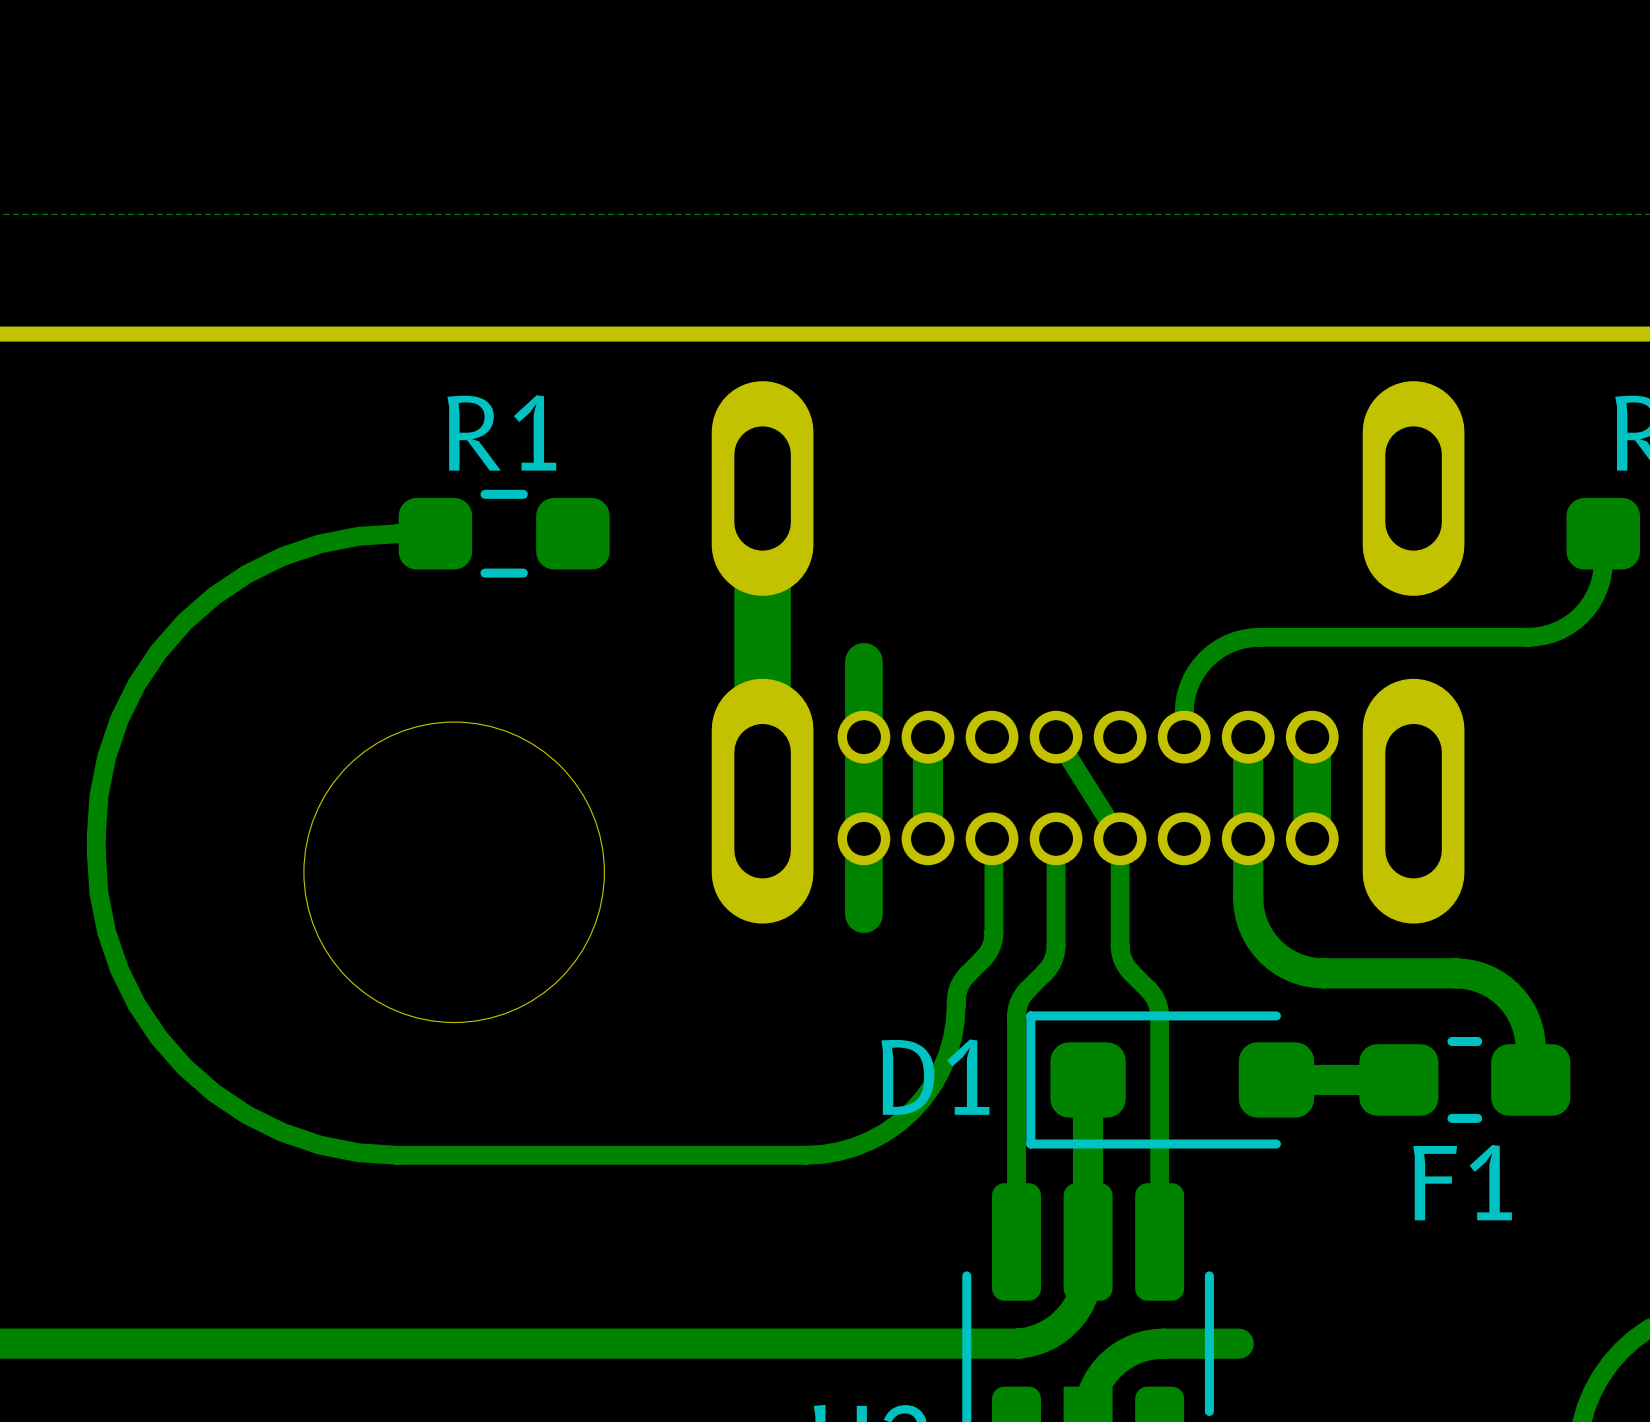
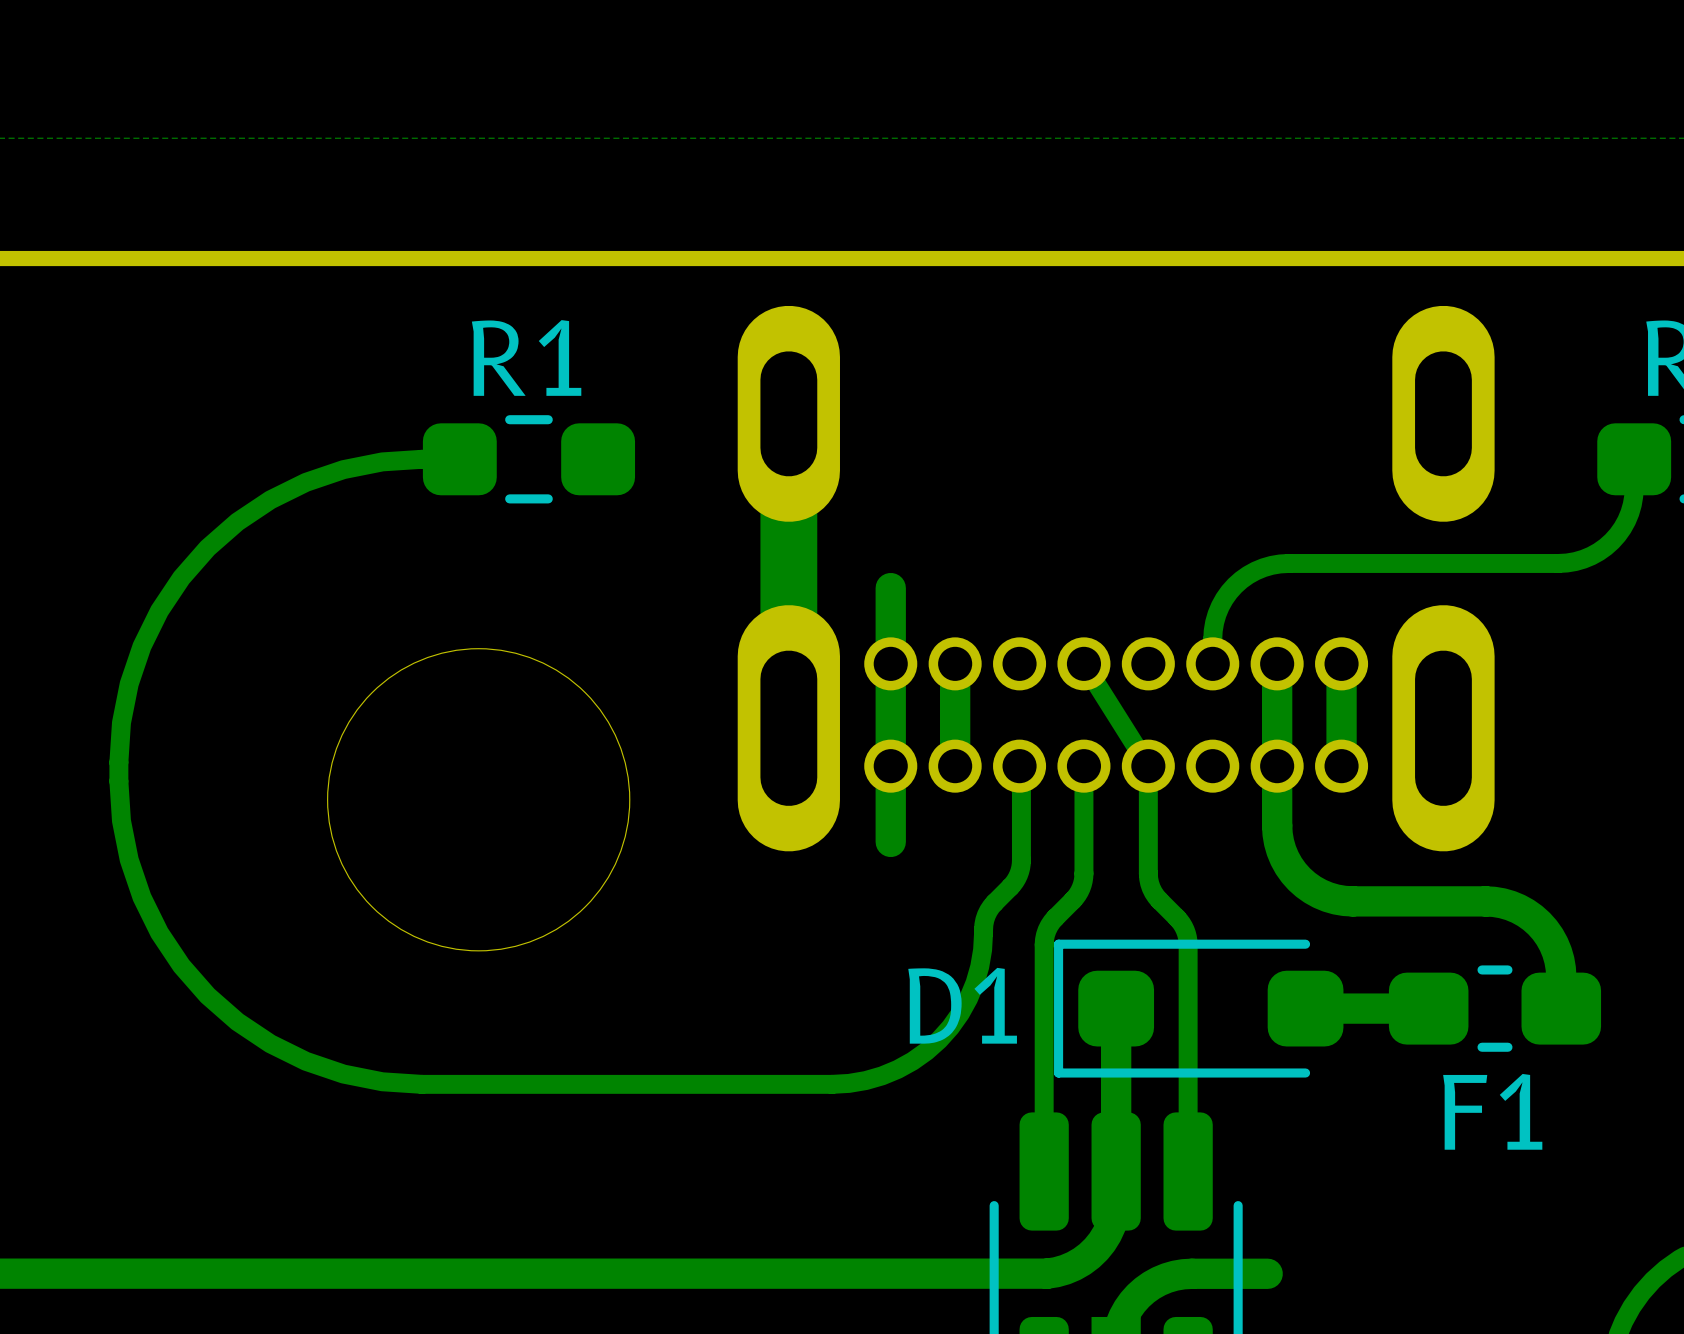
track width: thick (863, 661) (863, 914) -> thin (890, 588) (890, 841)
track width: thick (1312, 737) (1312, 838) -> thin (1341, 663) (1341, 766)

